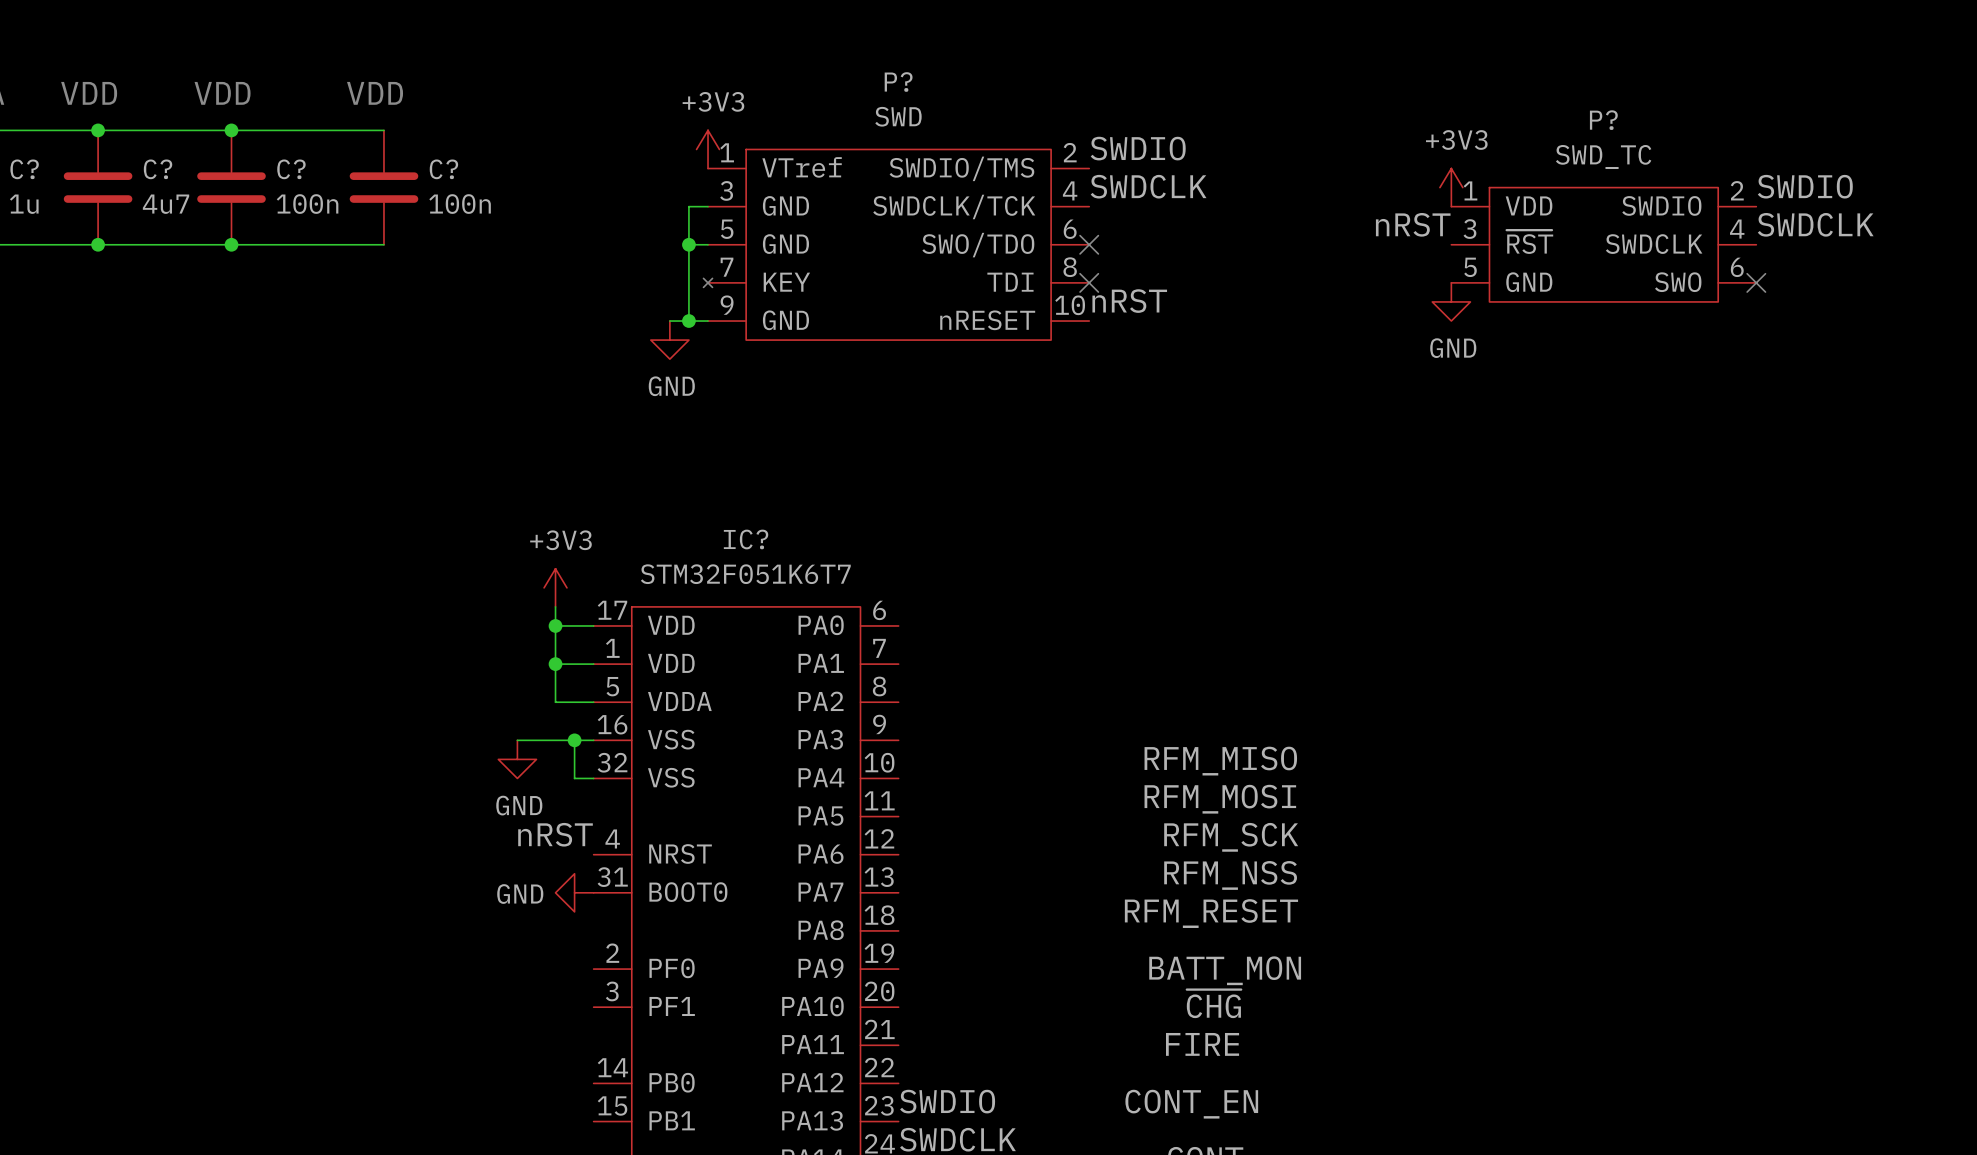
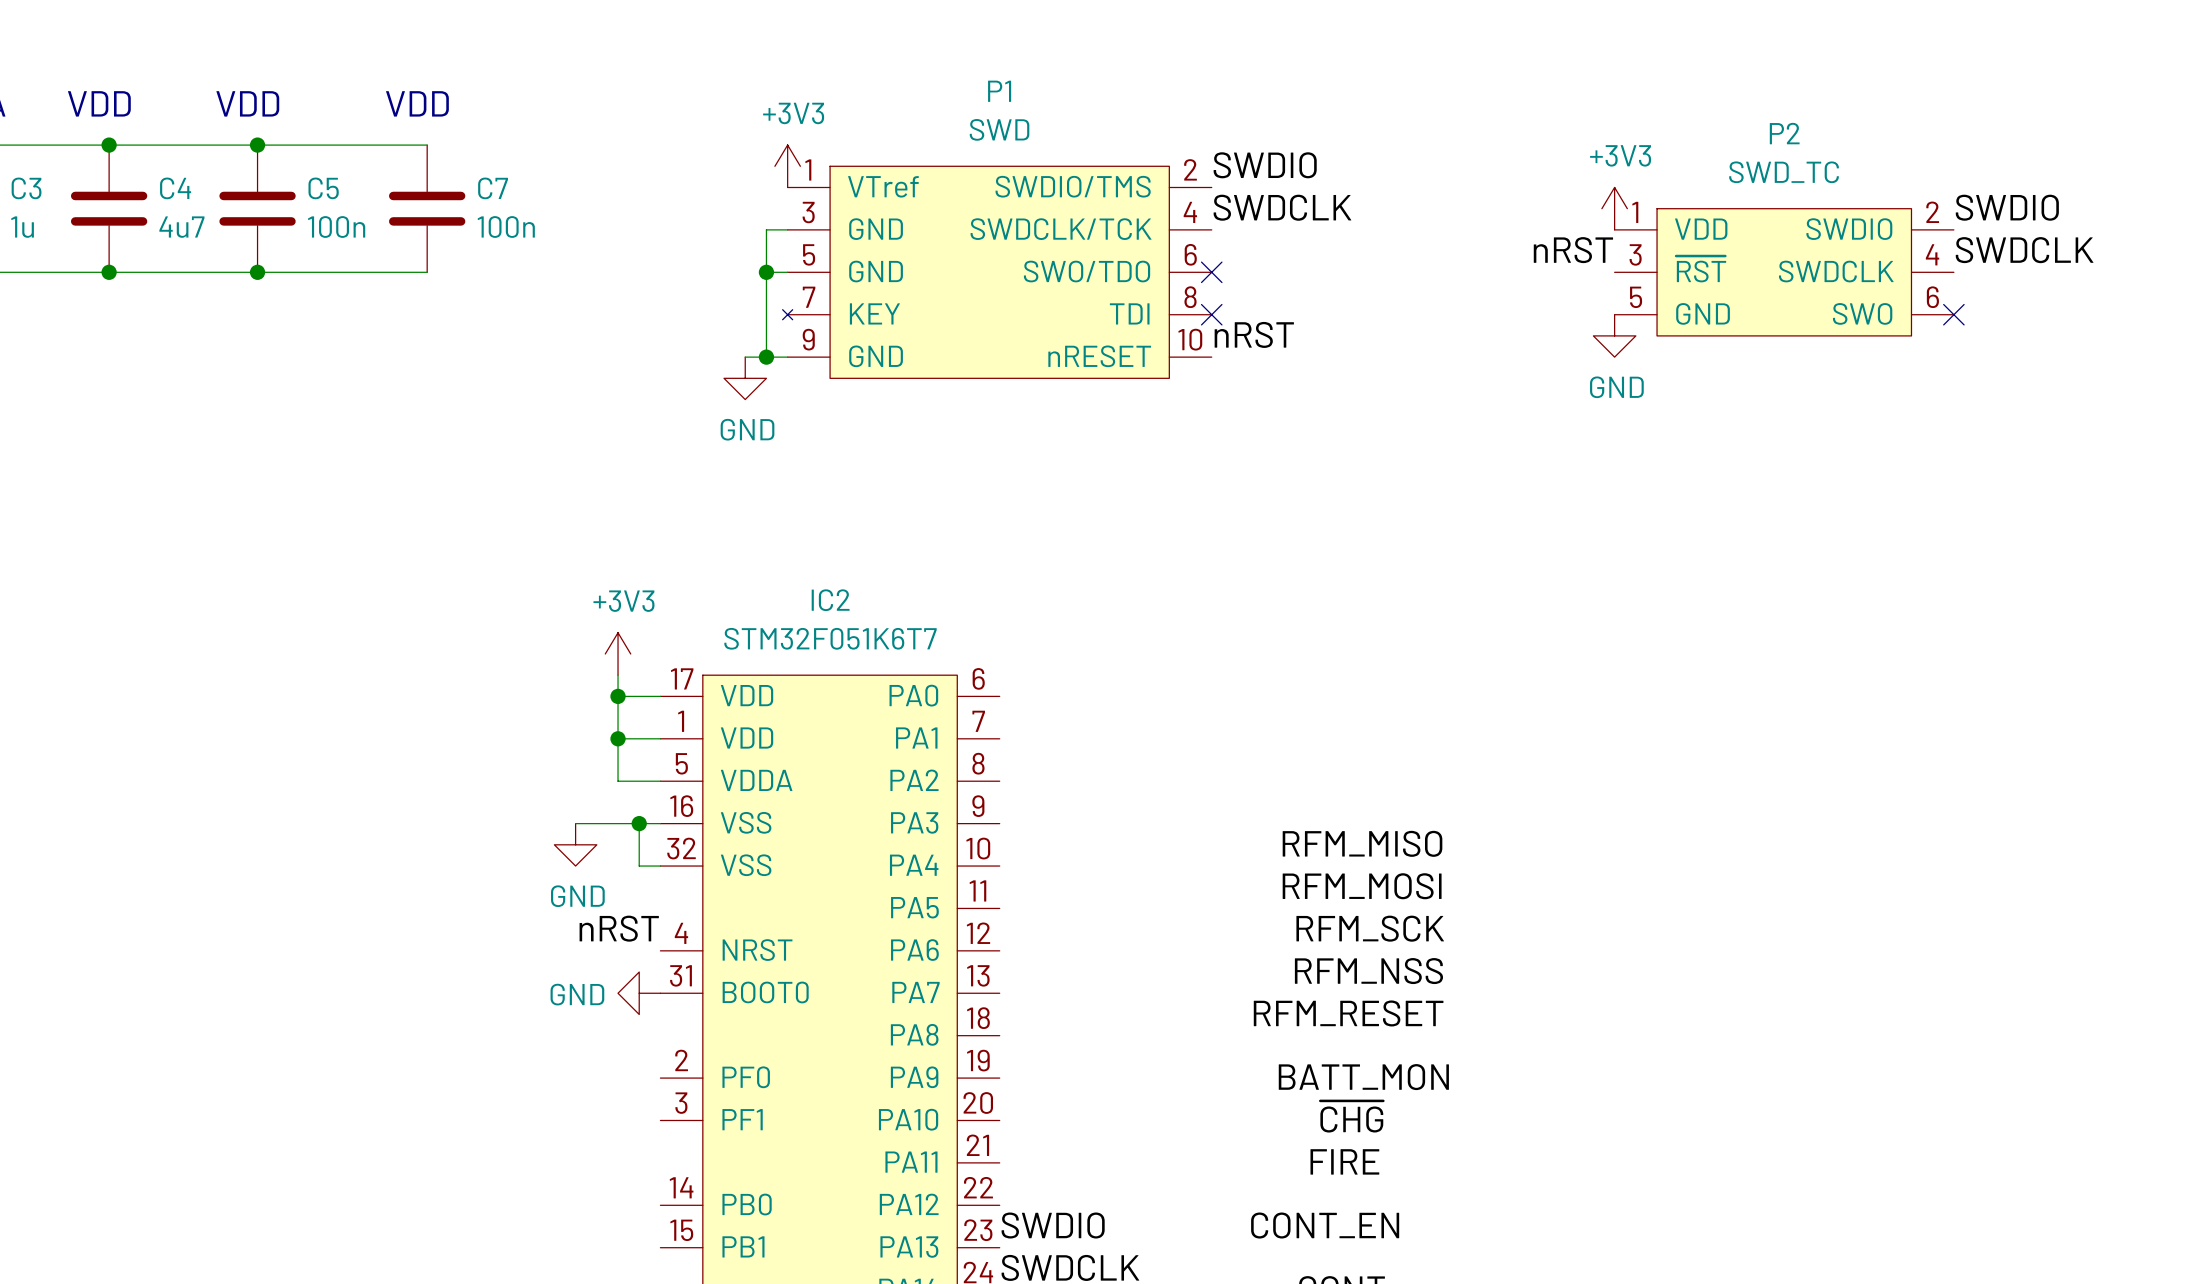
P? name: P? (898, 82) -> P1 (999, 91)
P? name: P? (1603, 120) -> P2 (1784, 133)
C? name: C? (24, 169) -> C3 (26, 188)
C? name: C? (158, 169) -> C4 (175, 188)
C? name: C? (291, 169) -> C5 (323, 188)
C? name: C? (443, 169) -> C7 (493, 188)
IC? name: IC? (746, 539) -> IC2 (830, 600)

